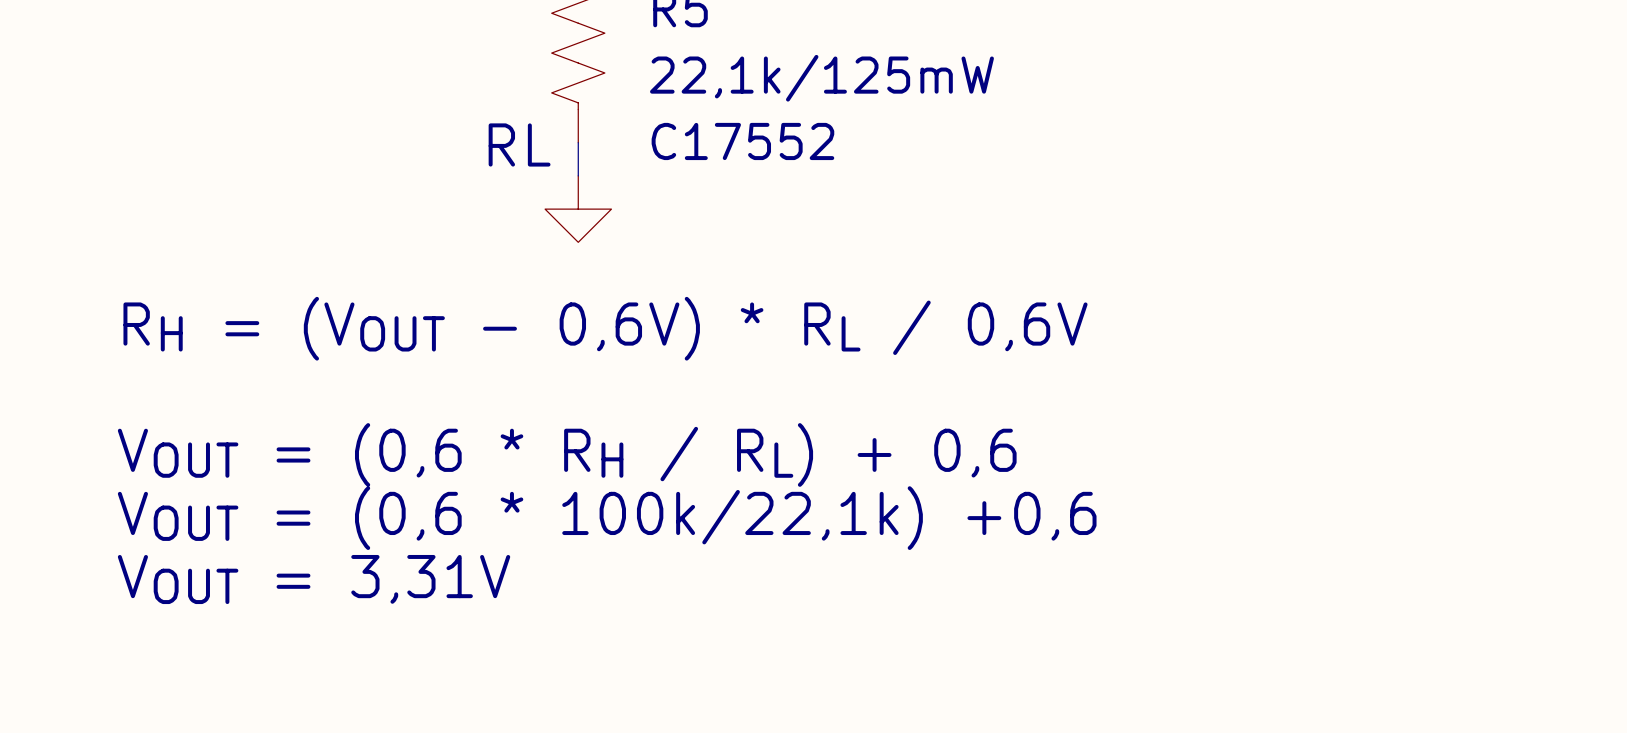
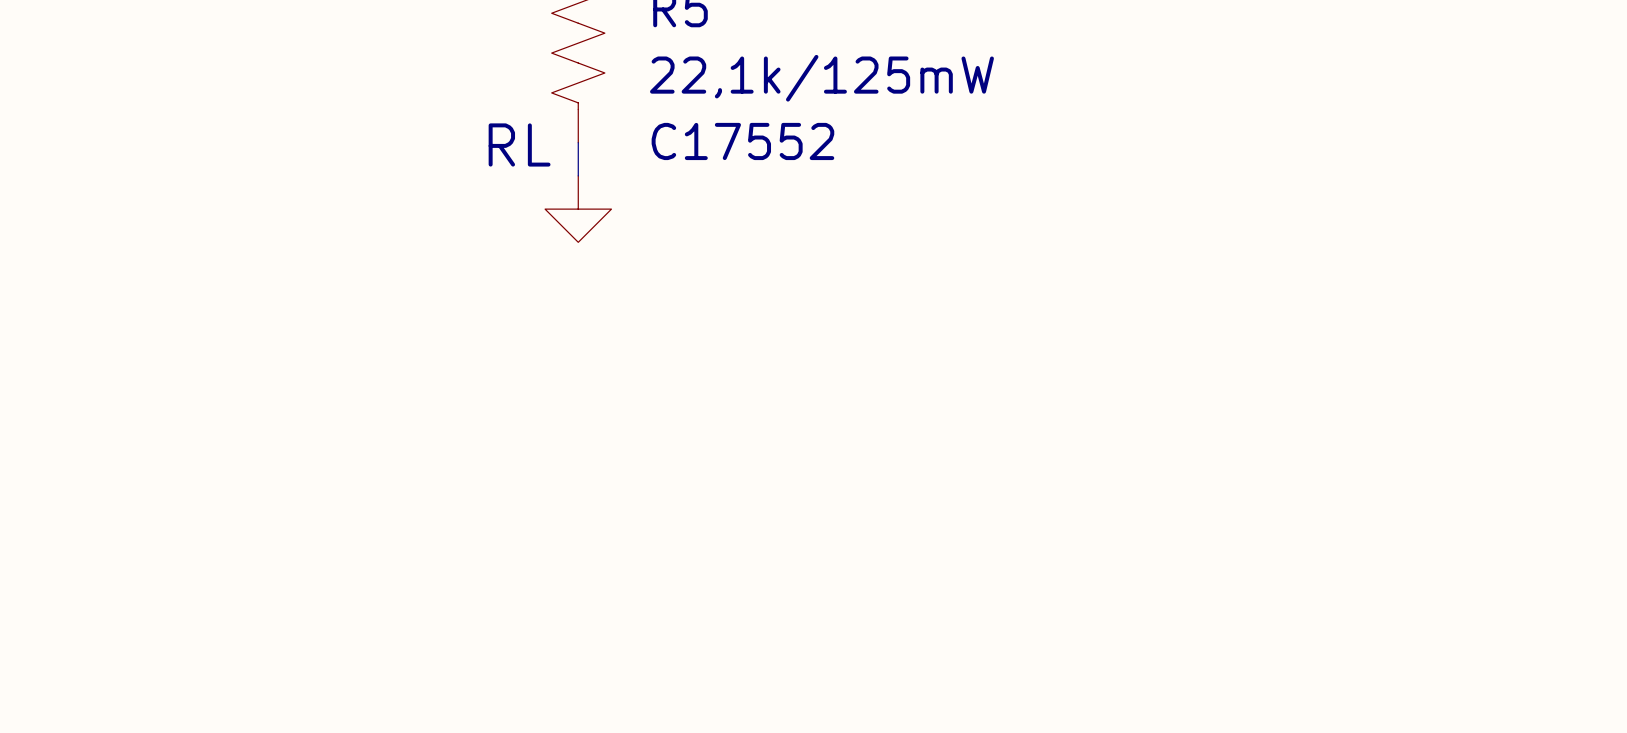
text: RH = (VOUT - 0,6V) * RL / 0,6V (605, 328) -> none
text: VOUT = (0,6 * RH / RL) + 0,6 (567, 454) -> none
text: VOUT = (0,6 * 100k/22,1k) +0,6 (607, 518) -> none
text: VOUT = 3,31V (314, 579) -> none

